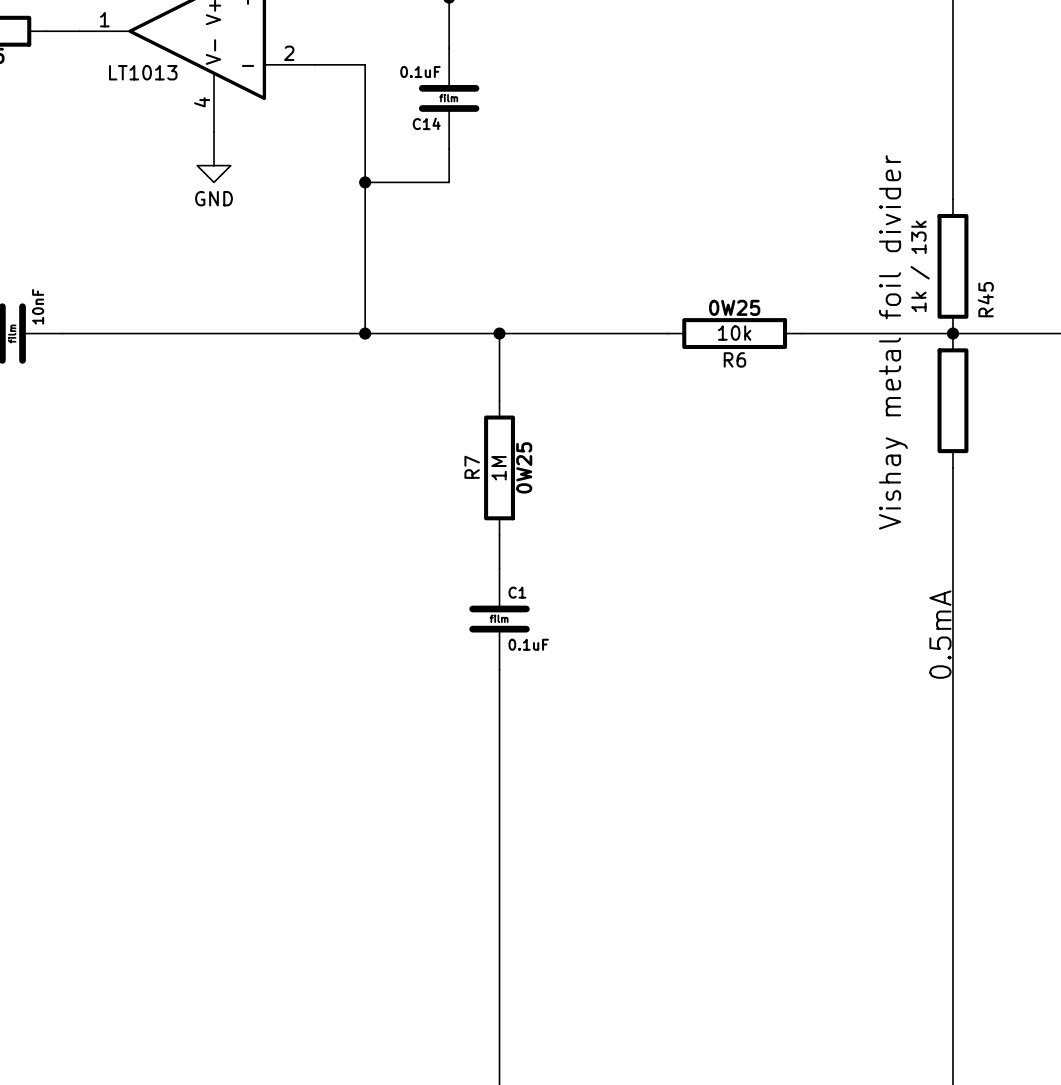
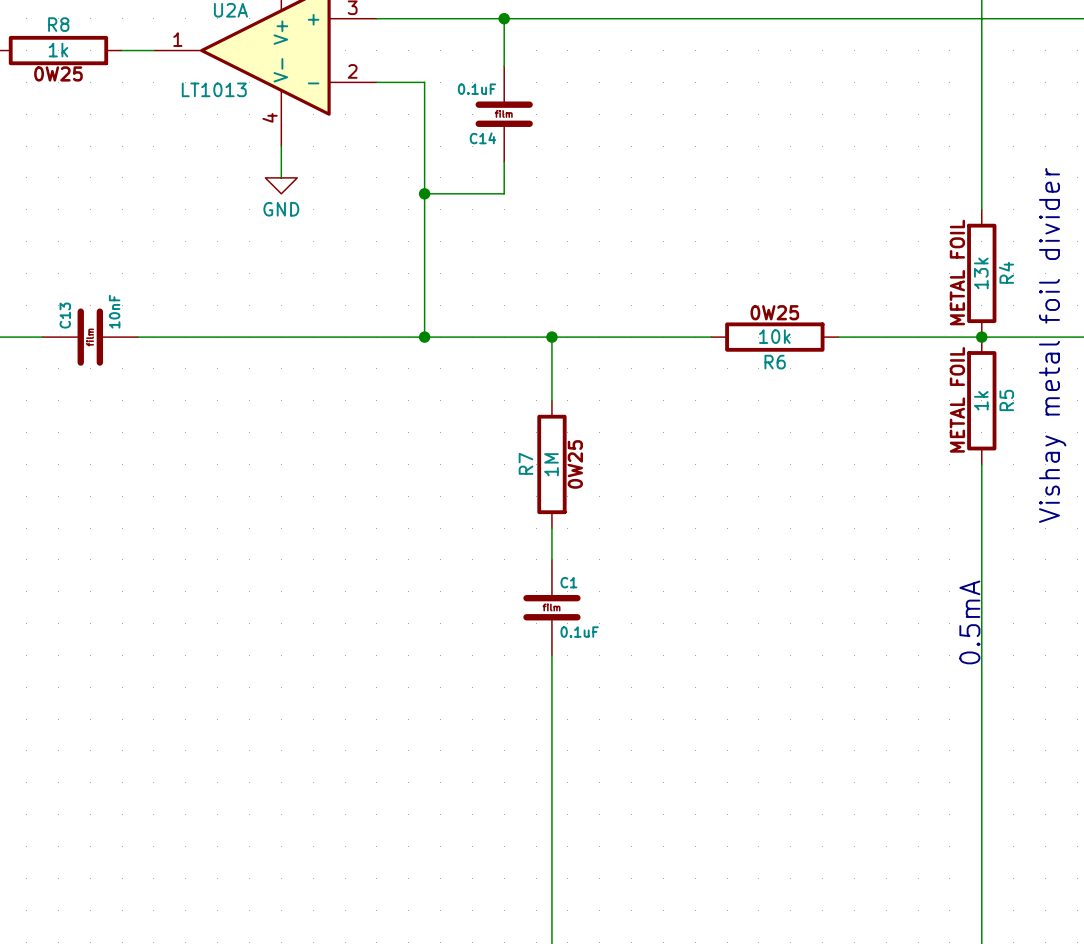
R4: none -> 13k (981, 273)
R45: 1k / 13k (952, 333) -> none
text position: Vishay metal foil divider (893, 342) -> Vishay metal foil divider (1052, 345)
R5: none -> 1k (981, 400)

